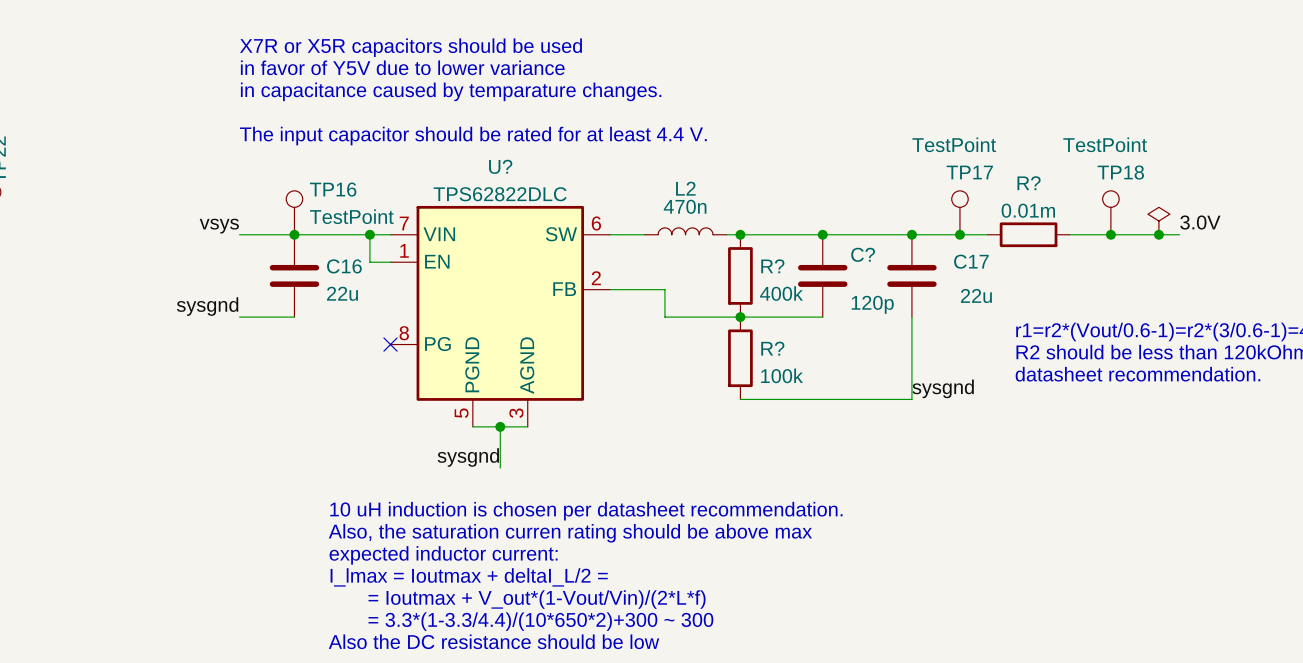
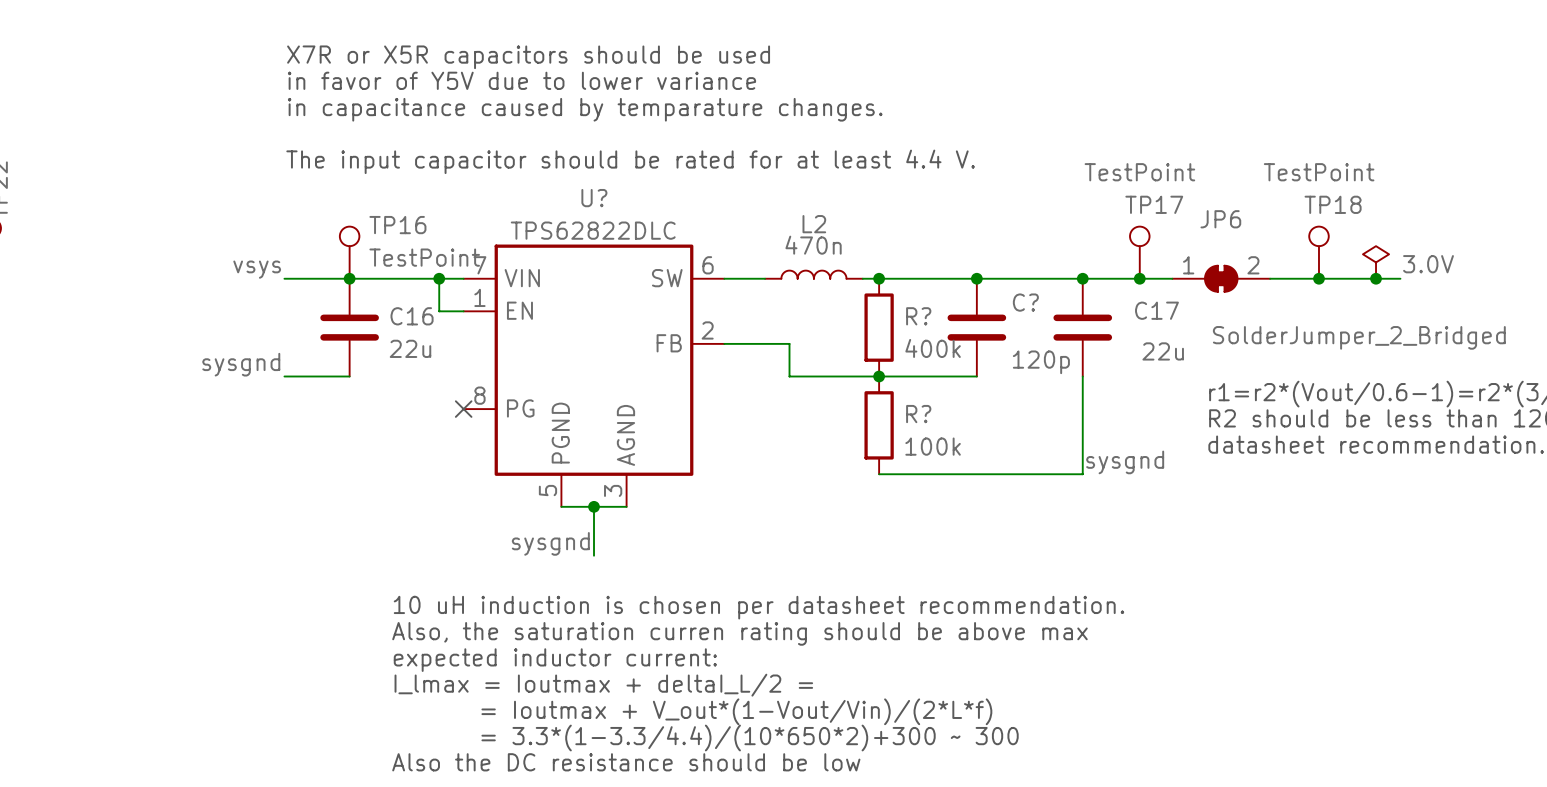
R?: 0.01m (1028, 234) -> none
JP6: none -> SolderJumper_2_Bridged (1221, 278)

